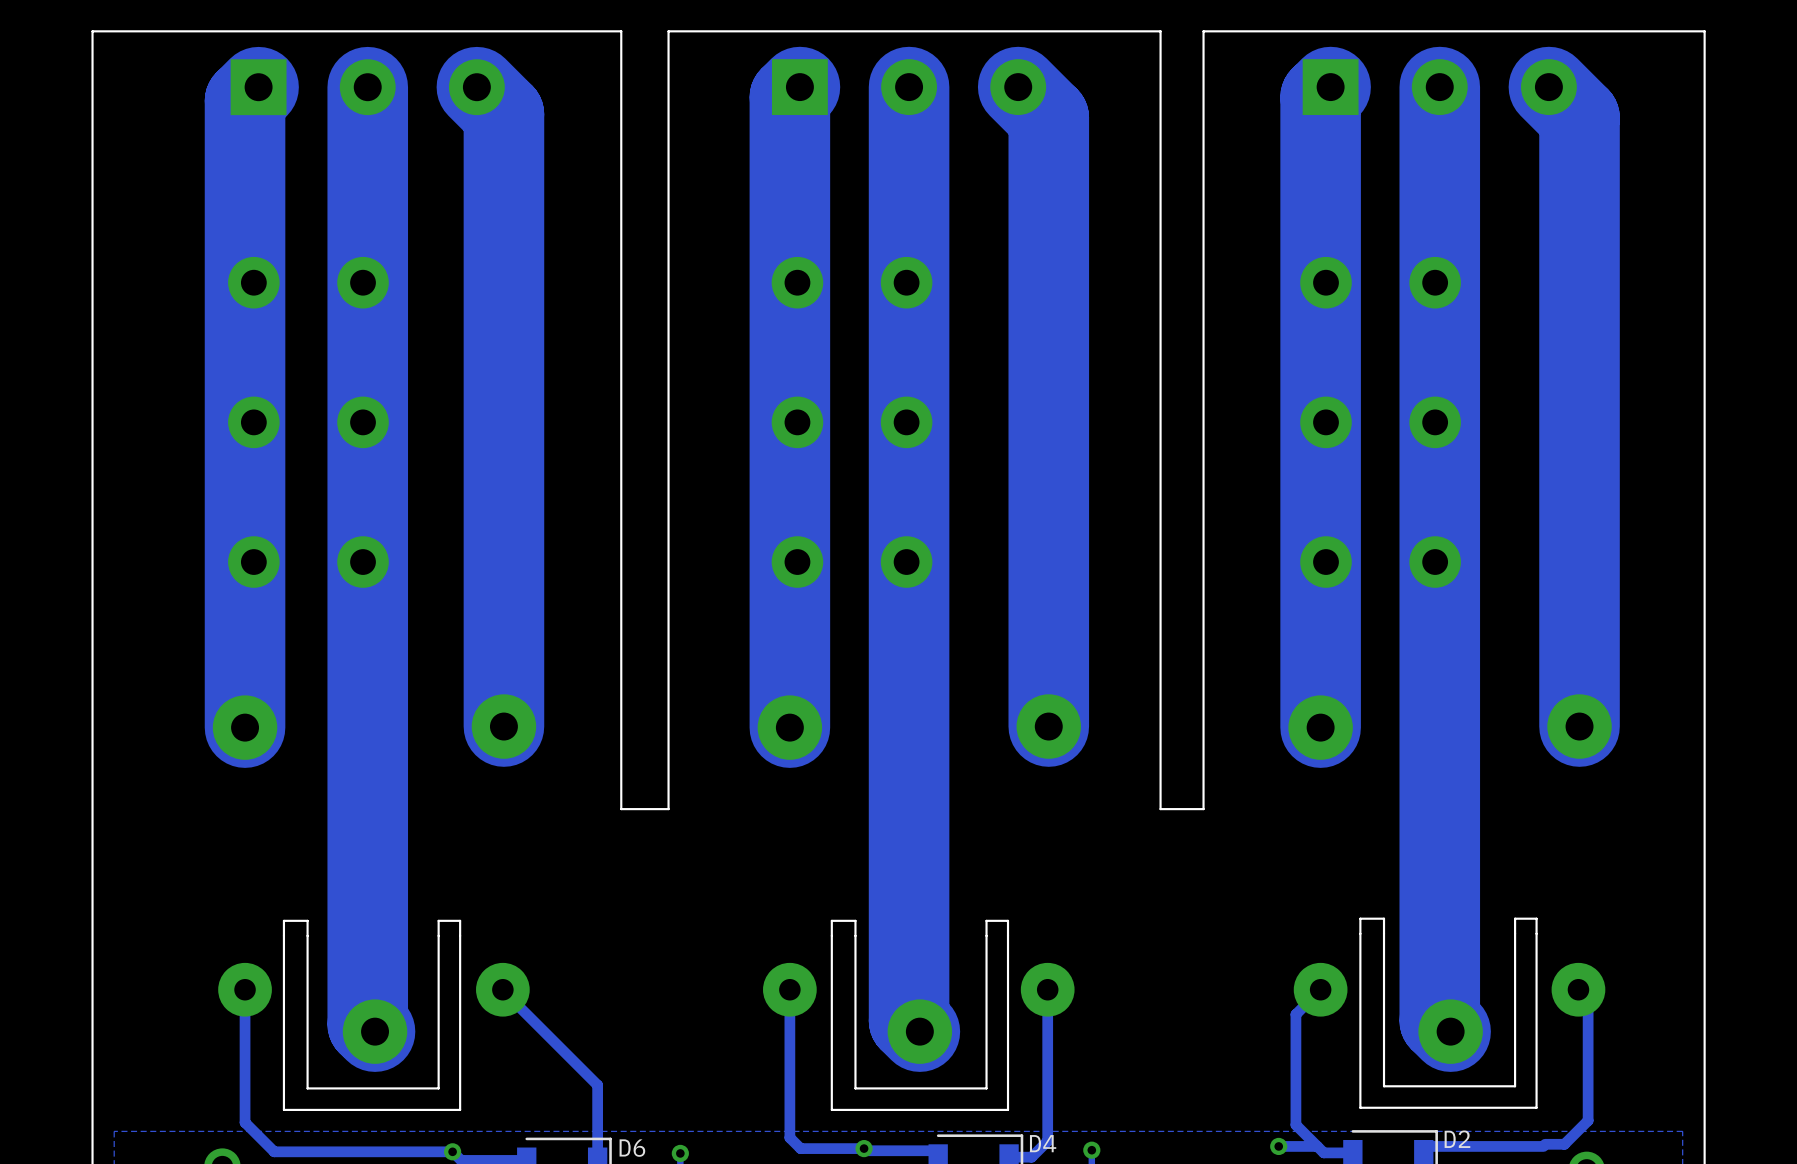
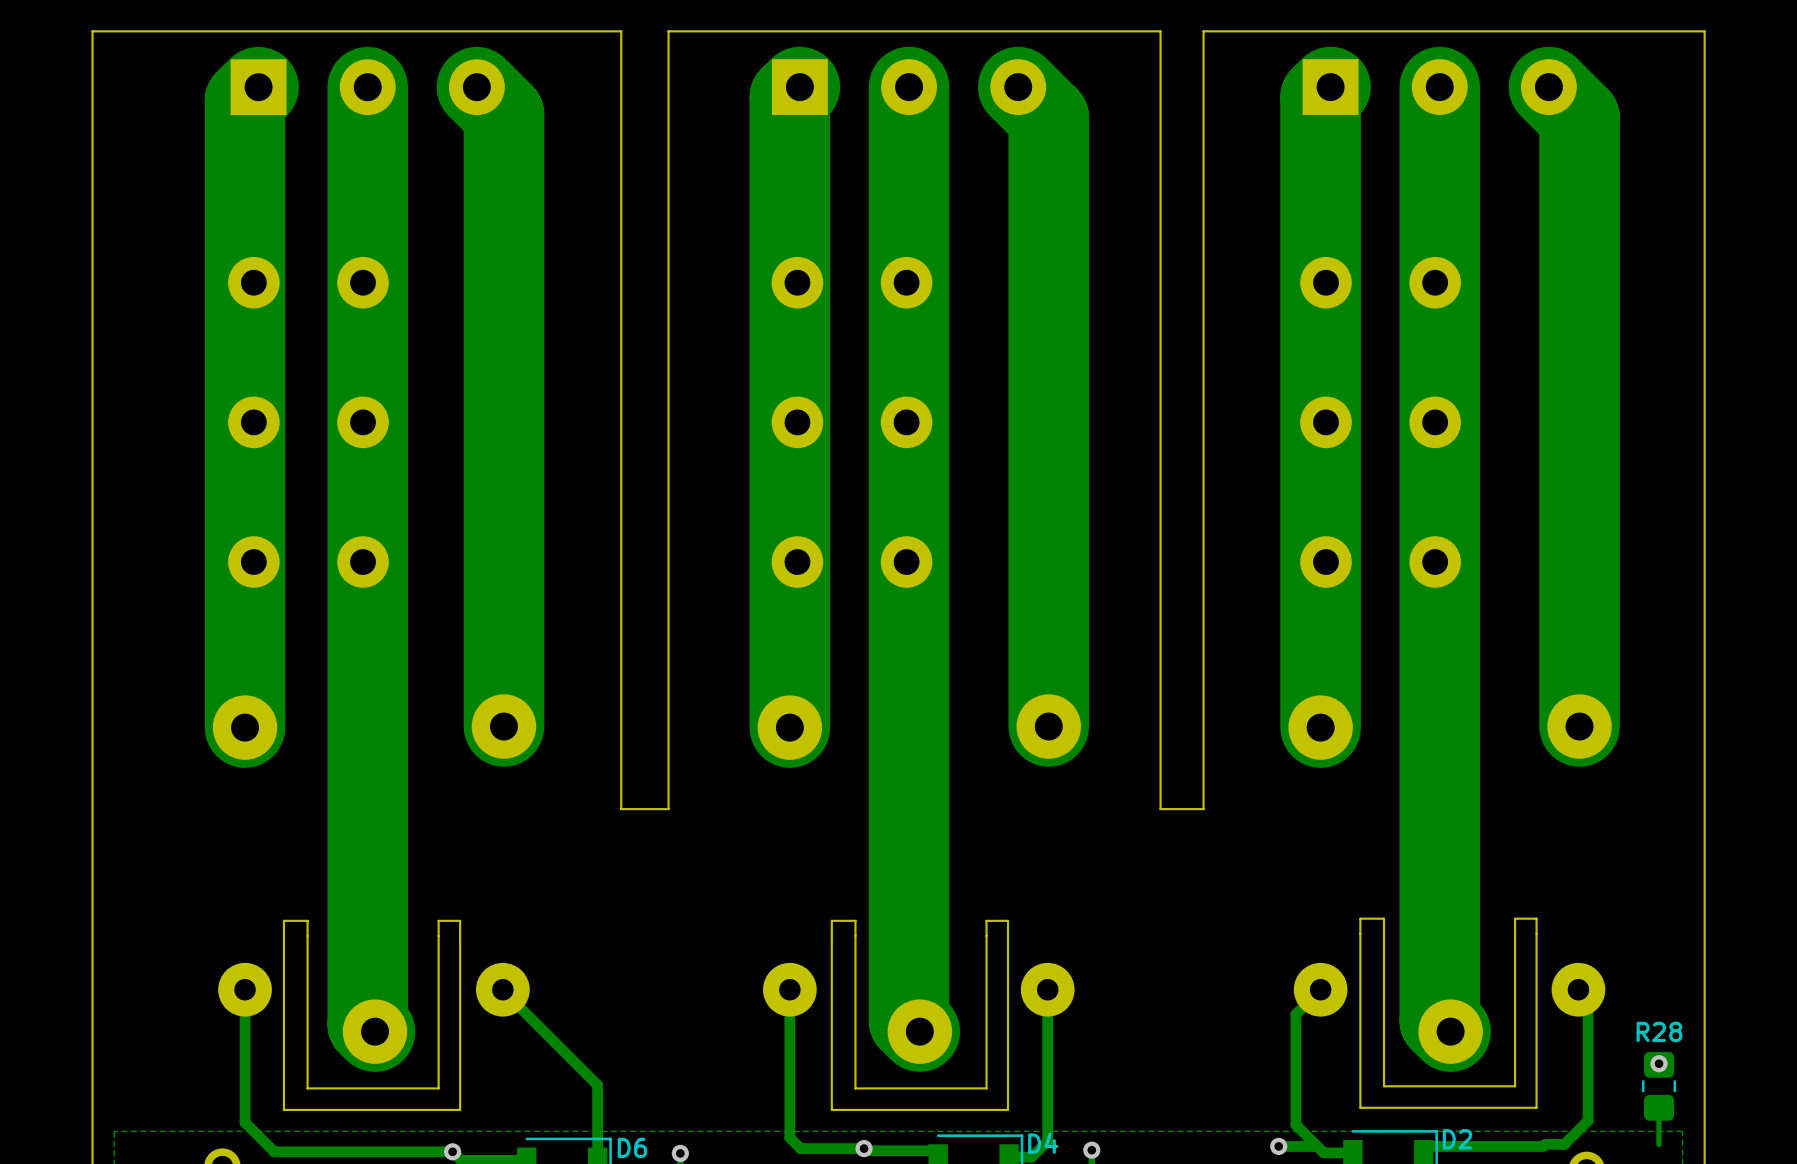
via: none -> (1659, 1063)
R28: none -> (1659, 1086)
track: none -> (1659, 1107) (1659, 1144)

